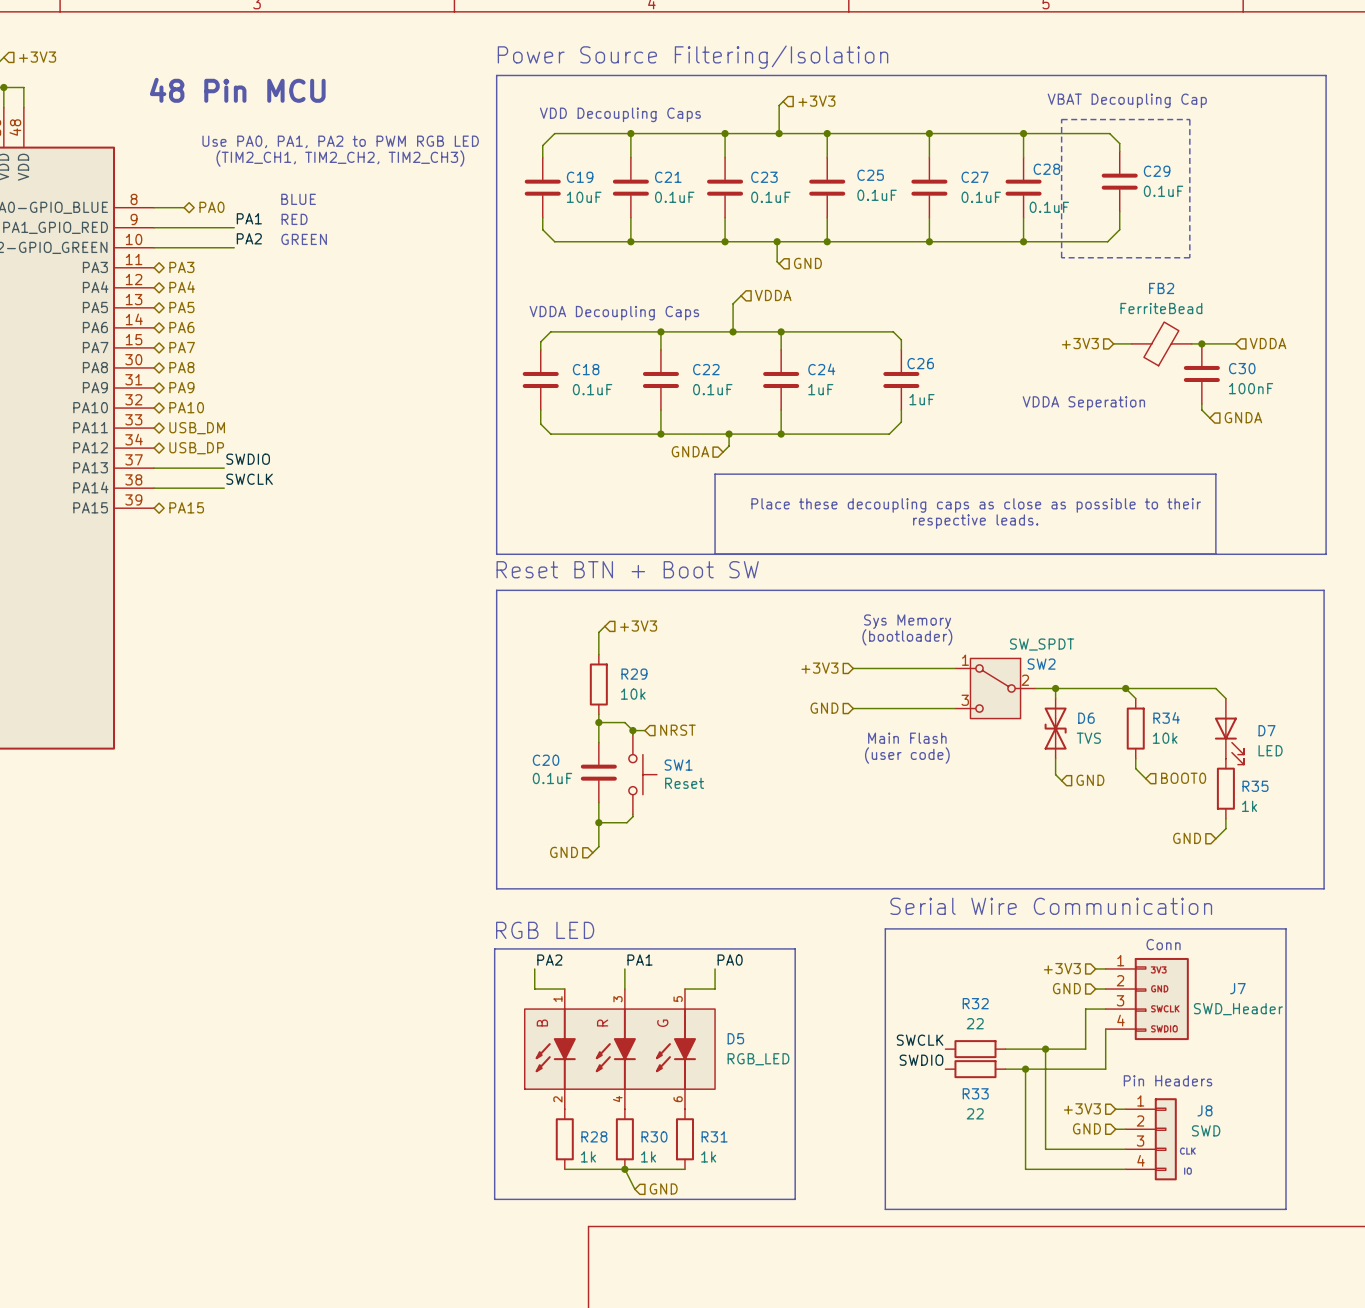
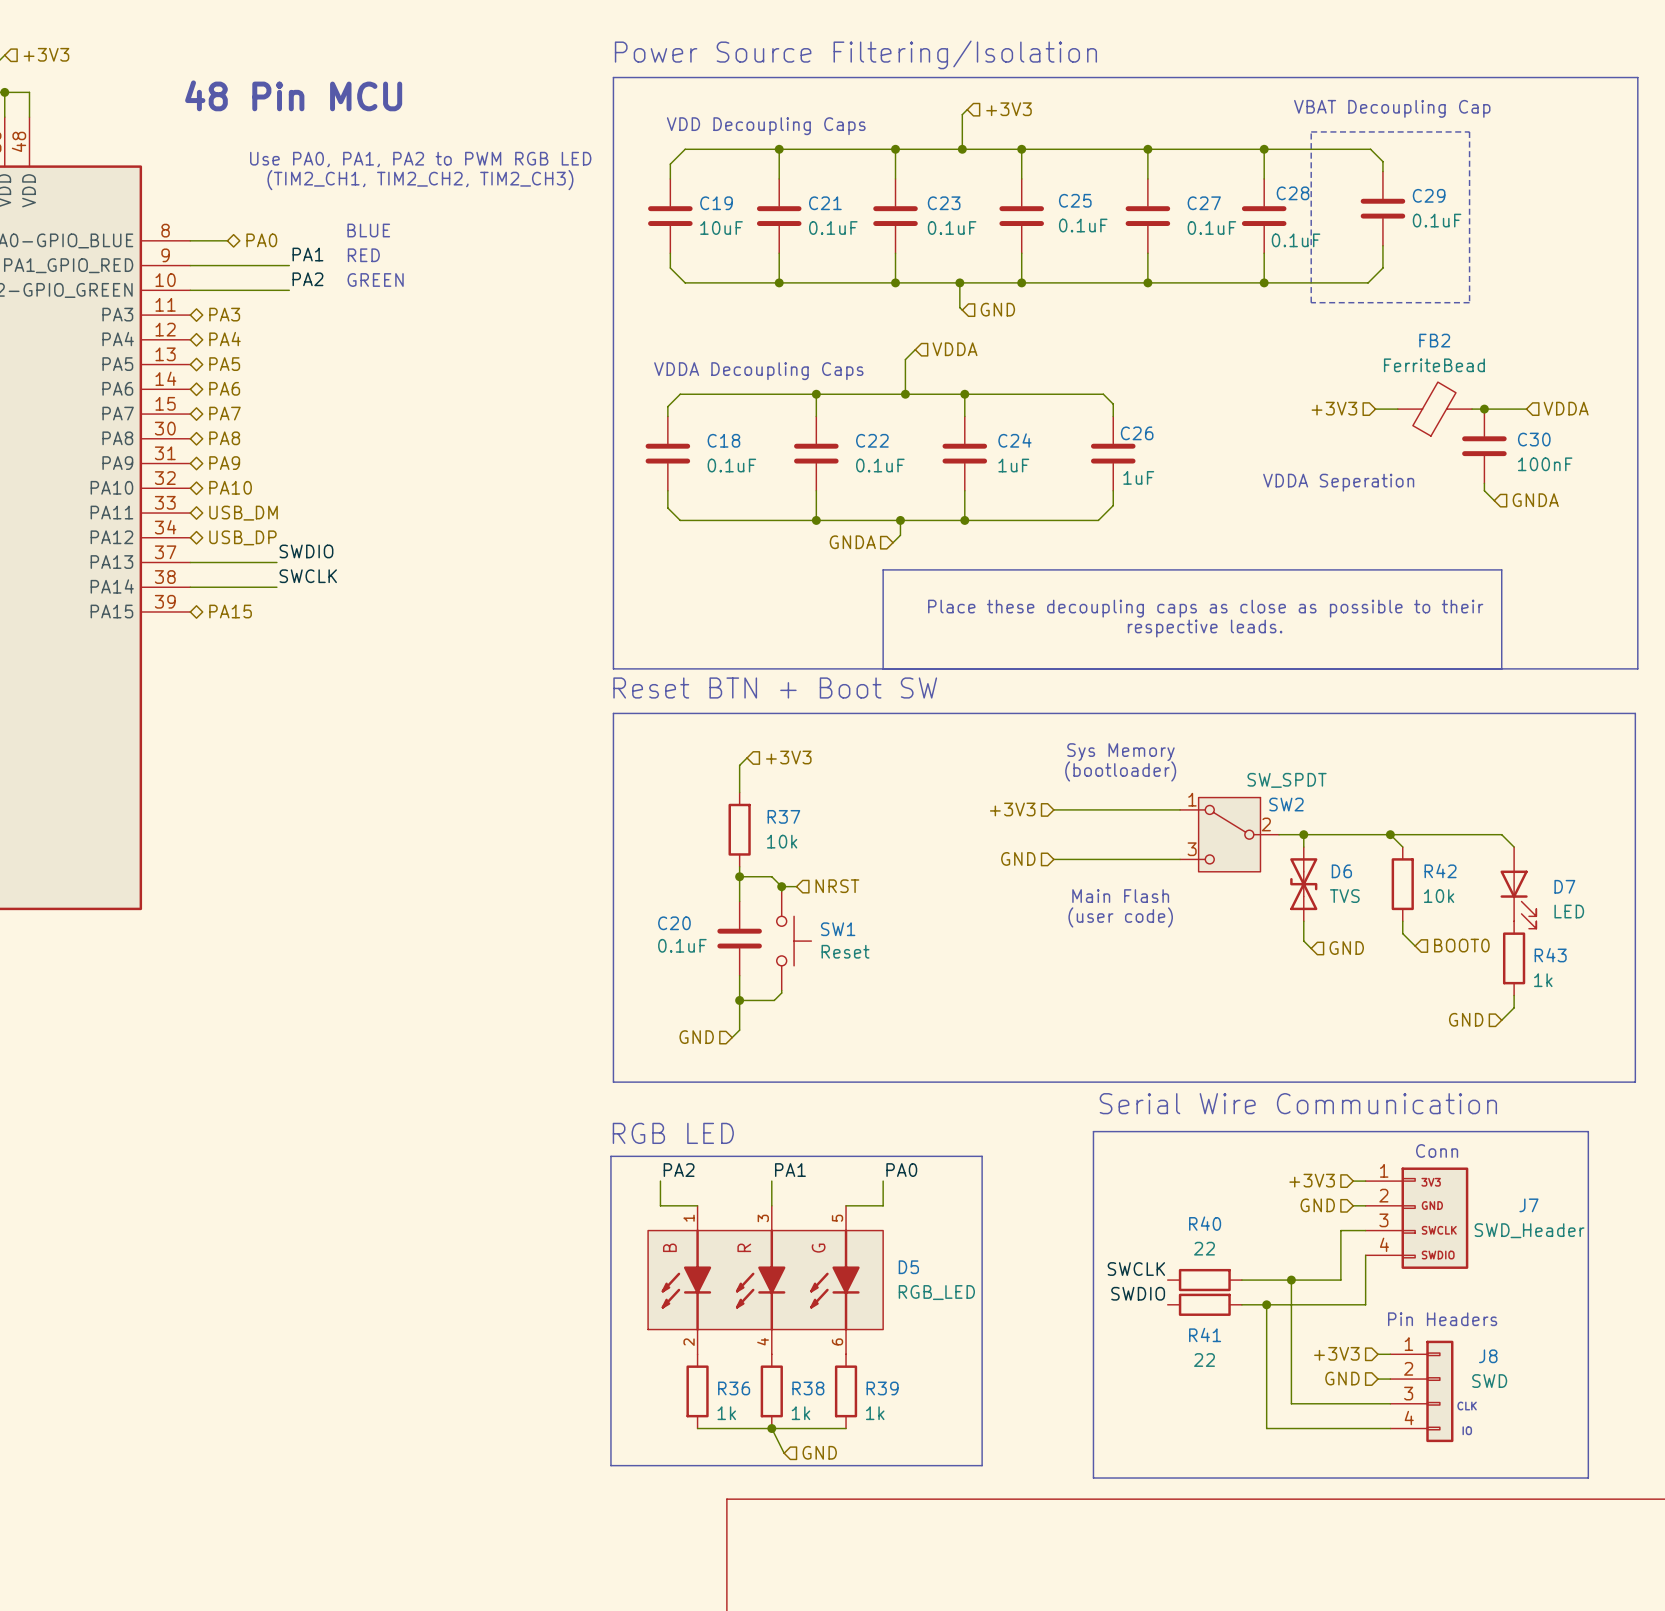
R29 name: R29 (634, 674) -> R37 (783, 816)
R34 name: R34 (1166, 717) -> R42 (1440, 871)
R35 name: R35 (1255, 786) -> R43 (1550, 955)
R32 name: R32 (975, 1003) -> R40 (1205, 1223)
R33 name: R33 (975, 1093) -> R41 (1205, 1334)
R28 name: R28 (594, 1136) -> R36 (734, 1388)
R30 name: R30 (654, 1136) -> R38 (808, 1388)
R31 name: R31 (714, 1136) -> R39 (882, 1388)

